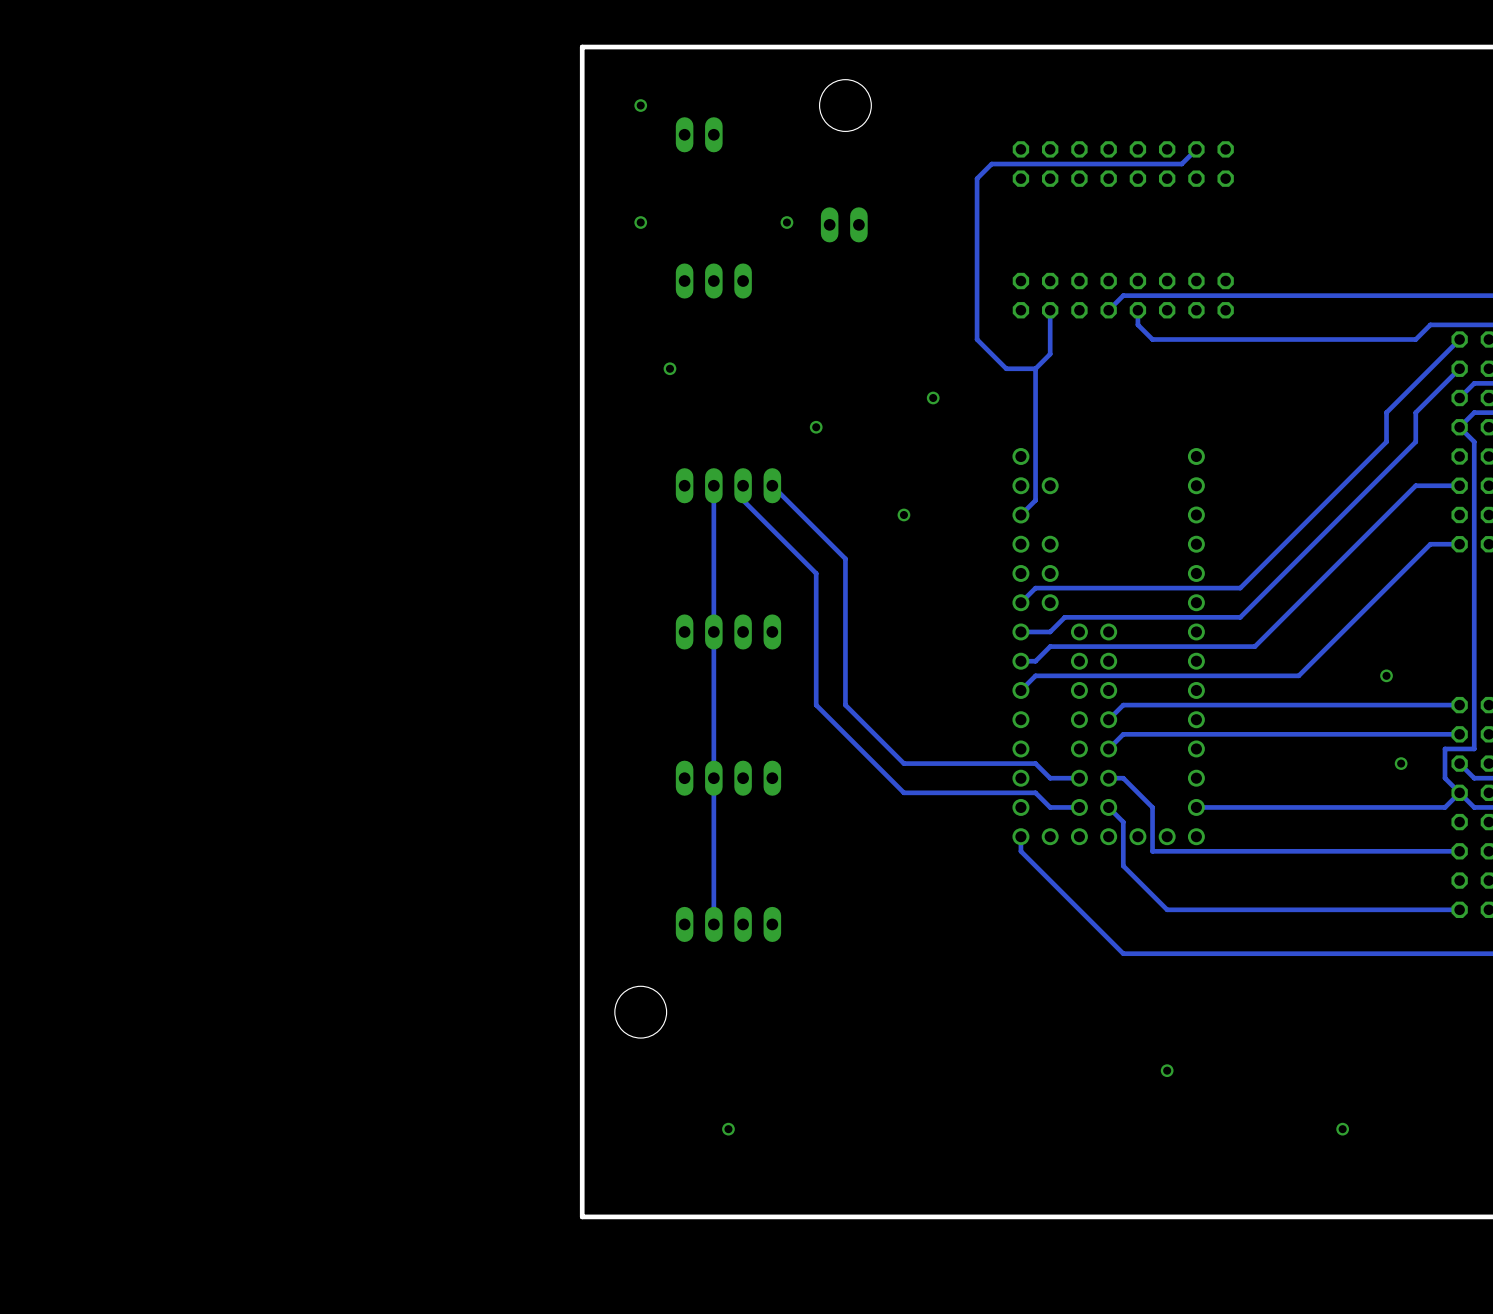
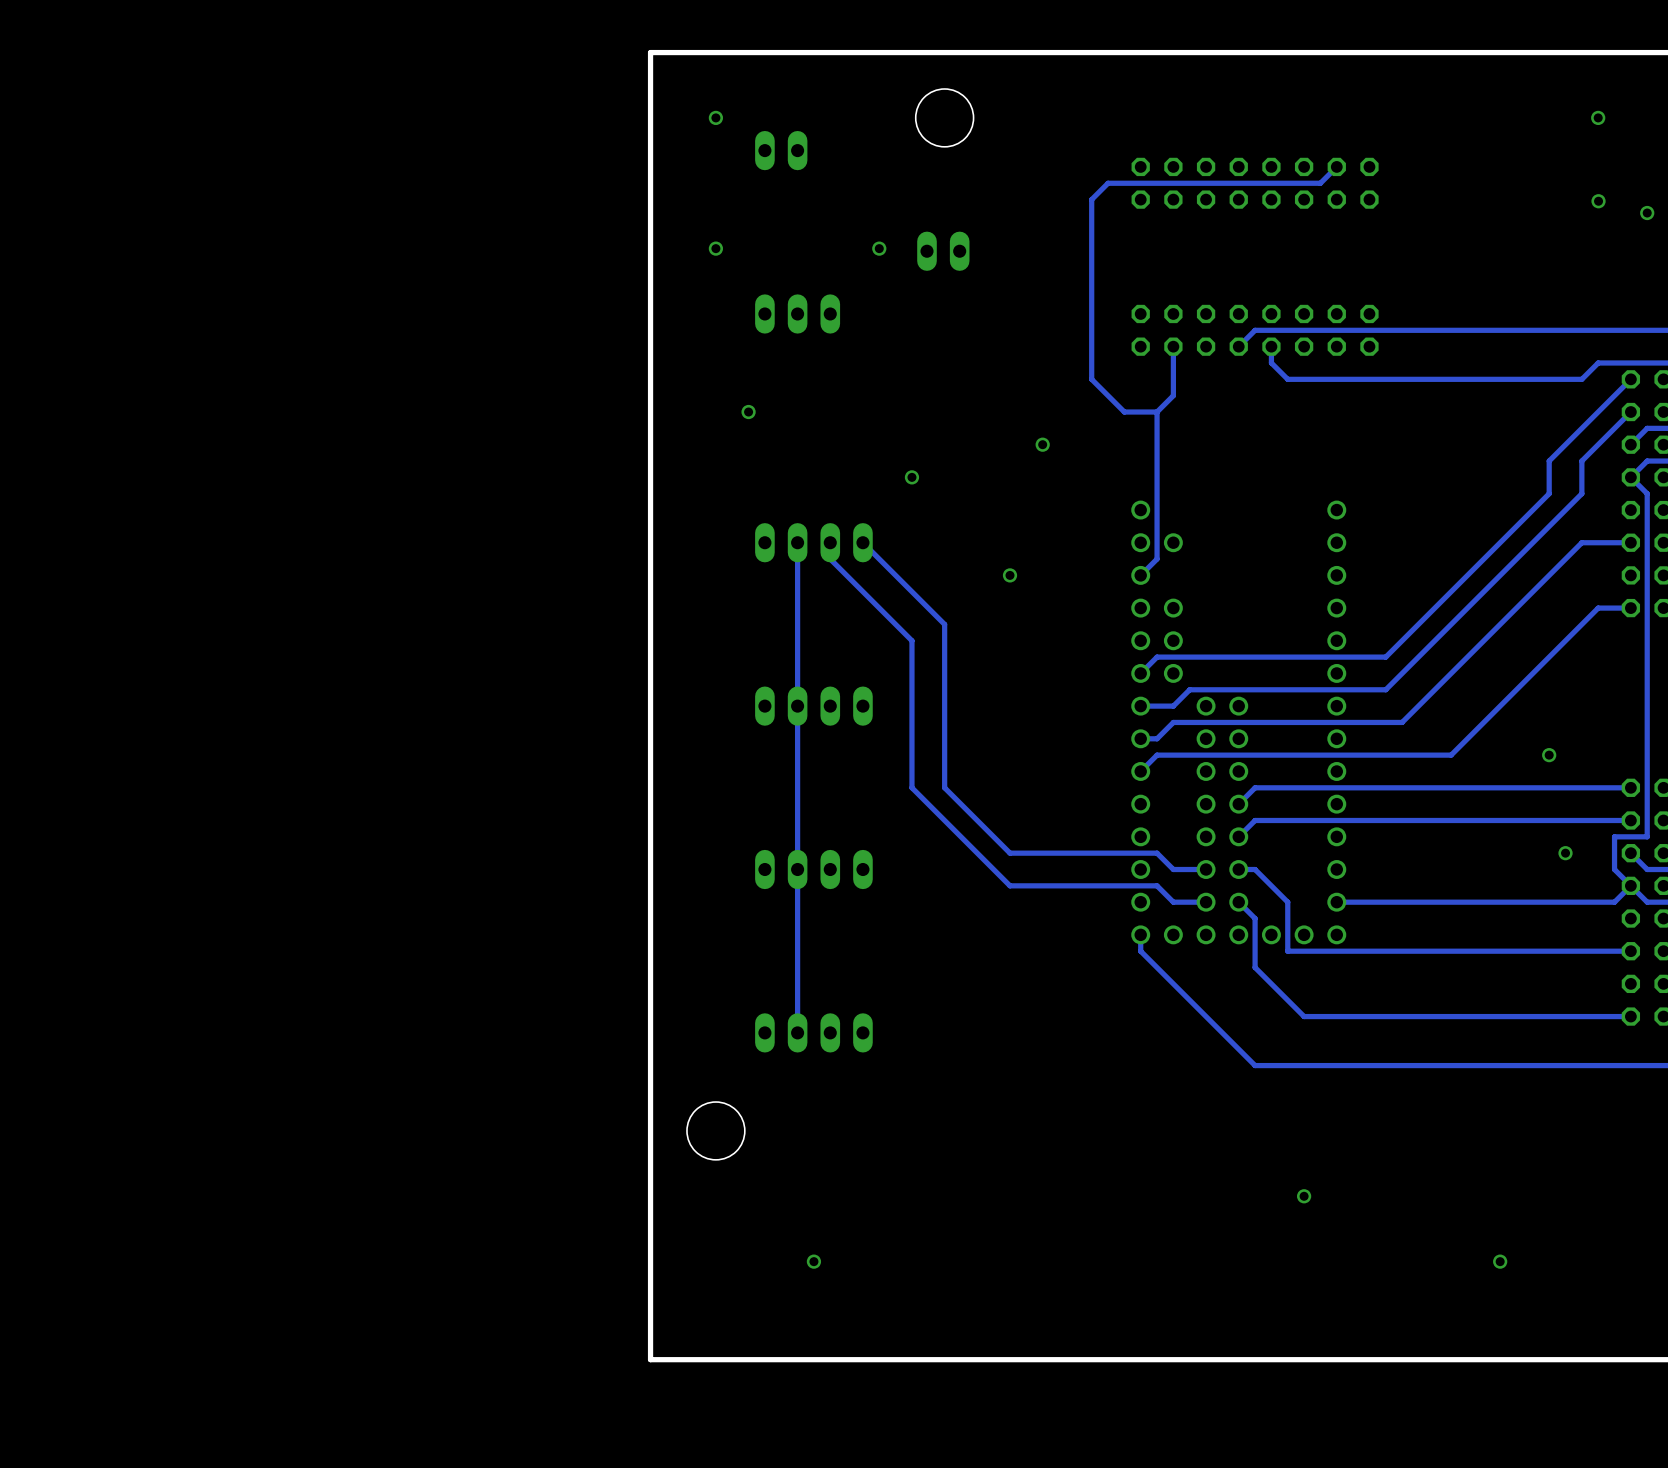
via: none -> (1598, 117)
via: none -> (1598, 201)
via: none -> (1647, 213)

